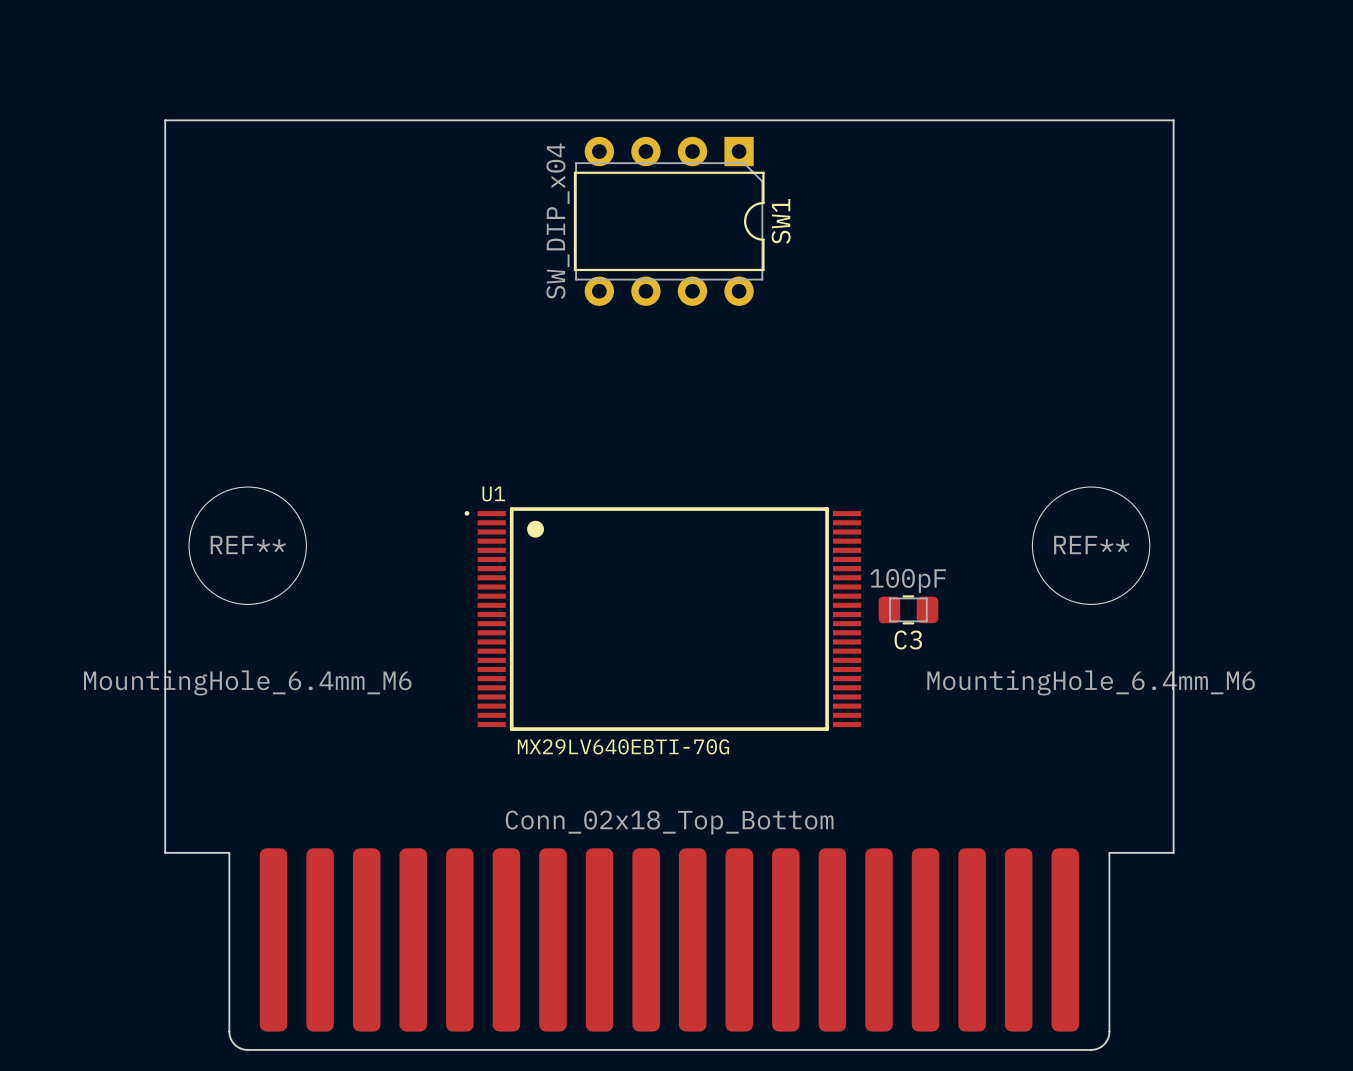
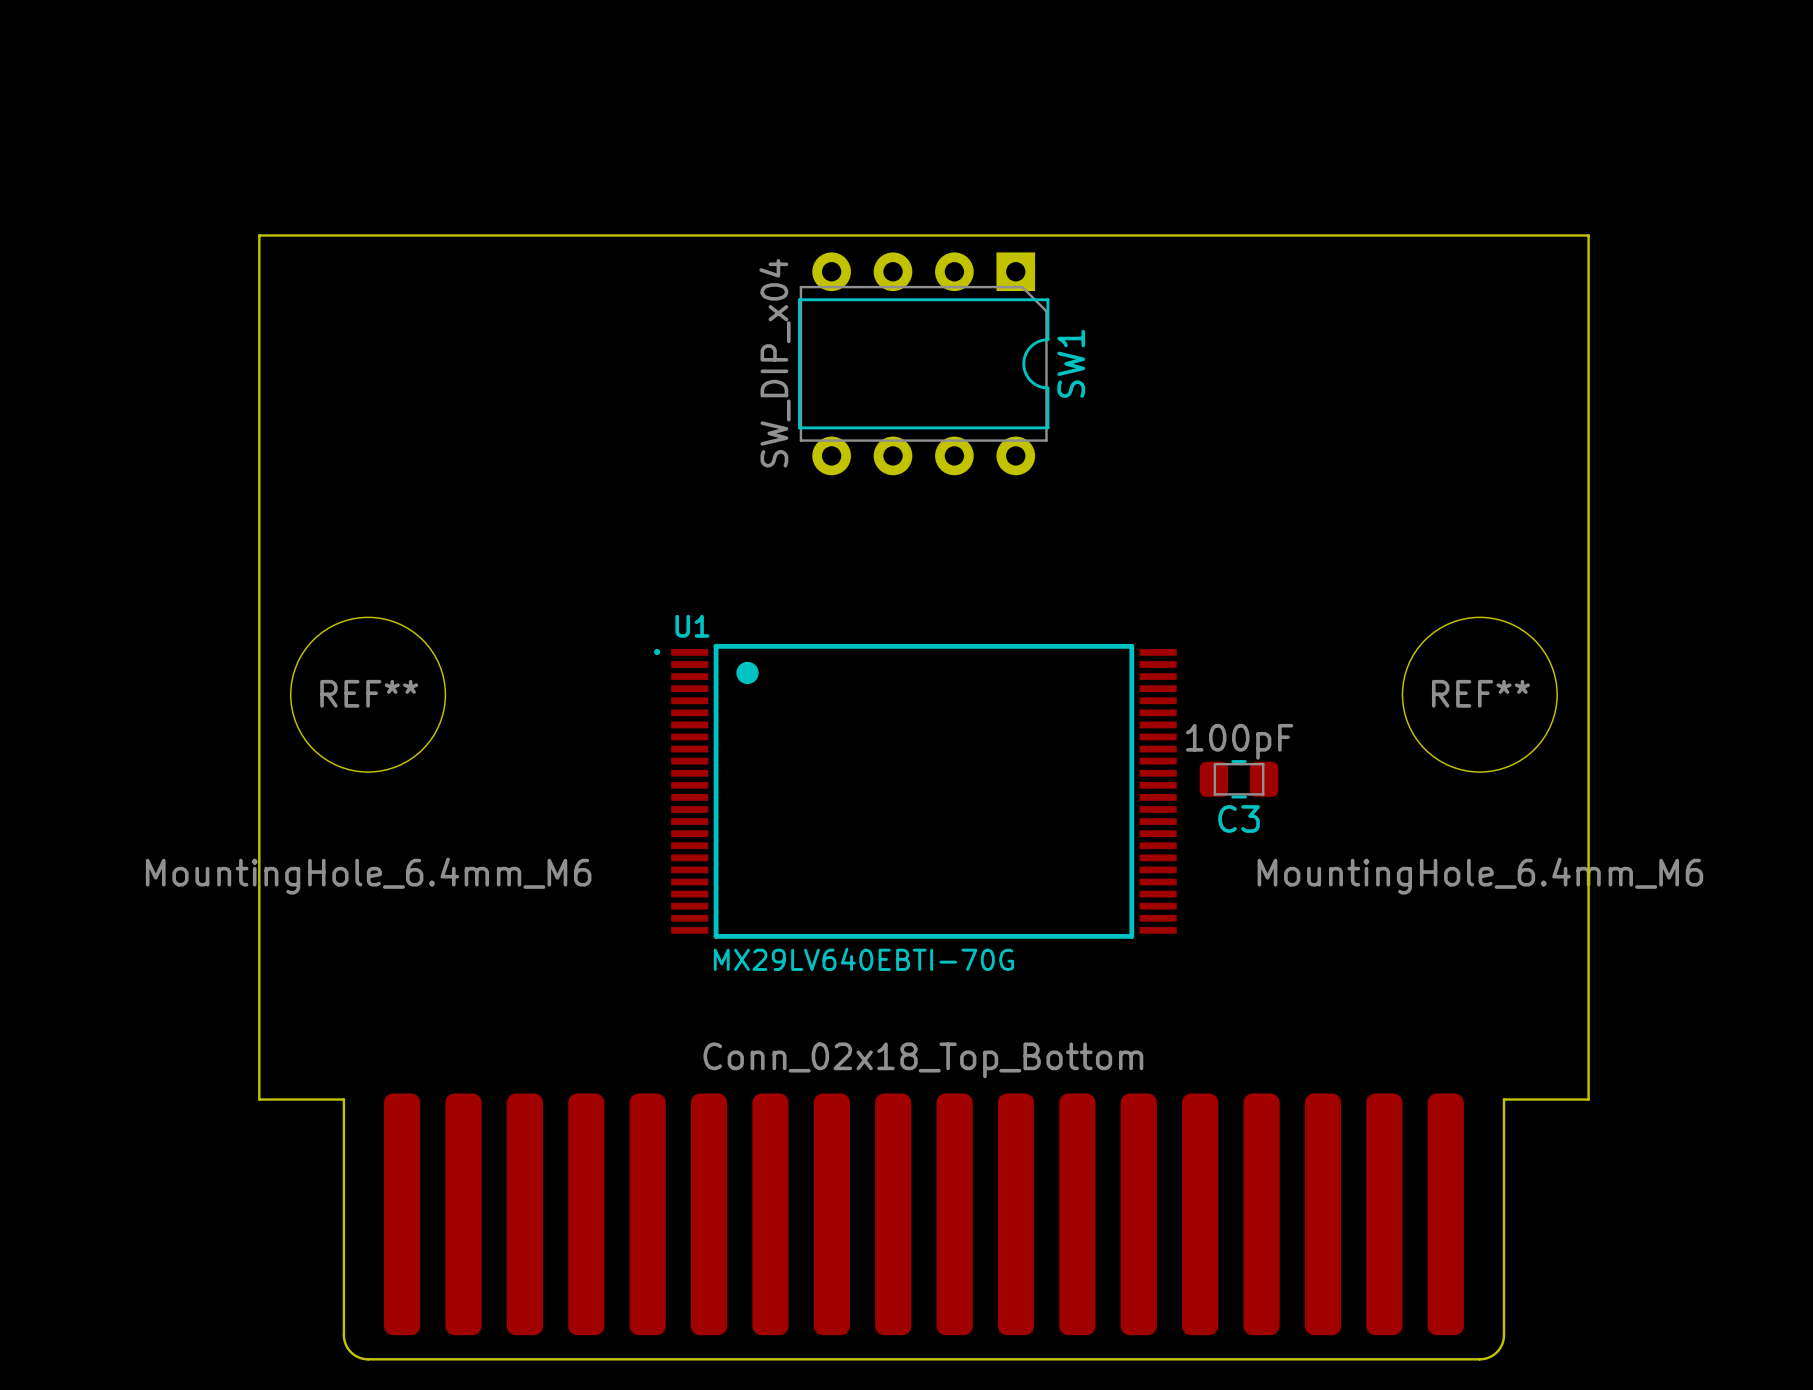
board edge: (165, 197) (165, 120) (1173, 120) (1173, 197) -> (259, 235) (1588, 235)
SW1 position: (669, 221) -> (923, 363)

